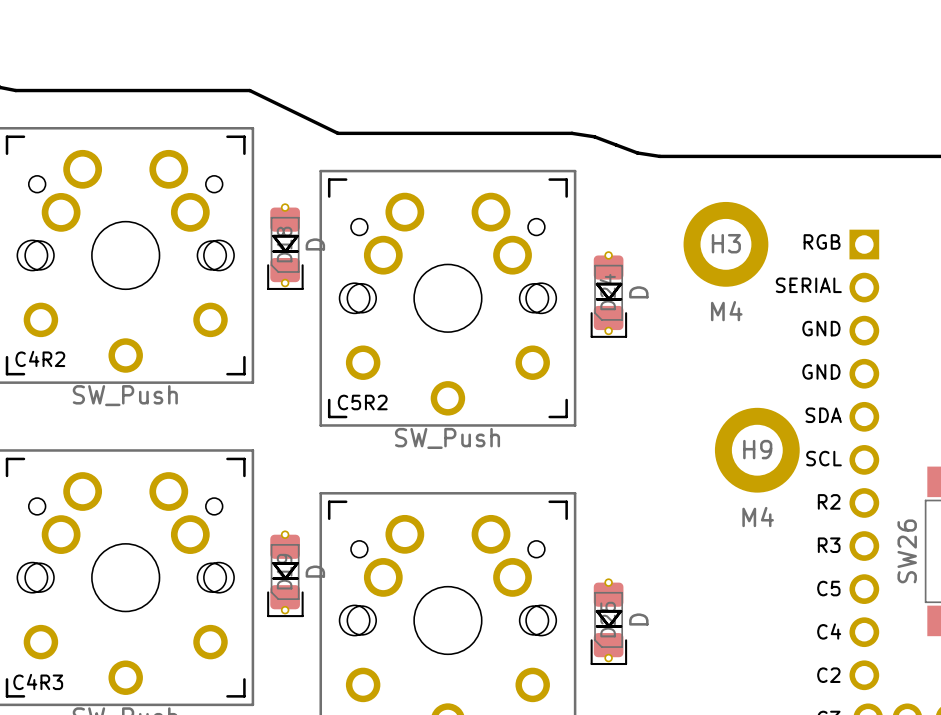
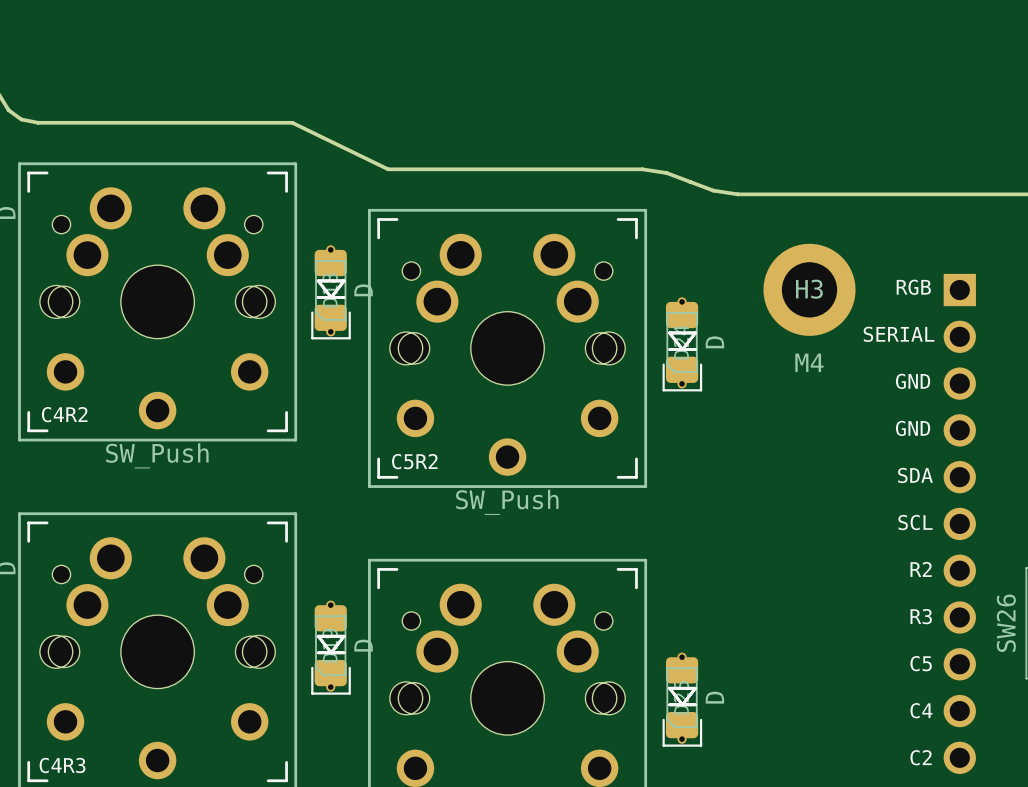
H9: M4 (757, 450) -> none

